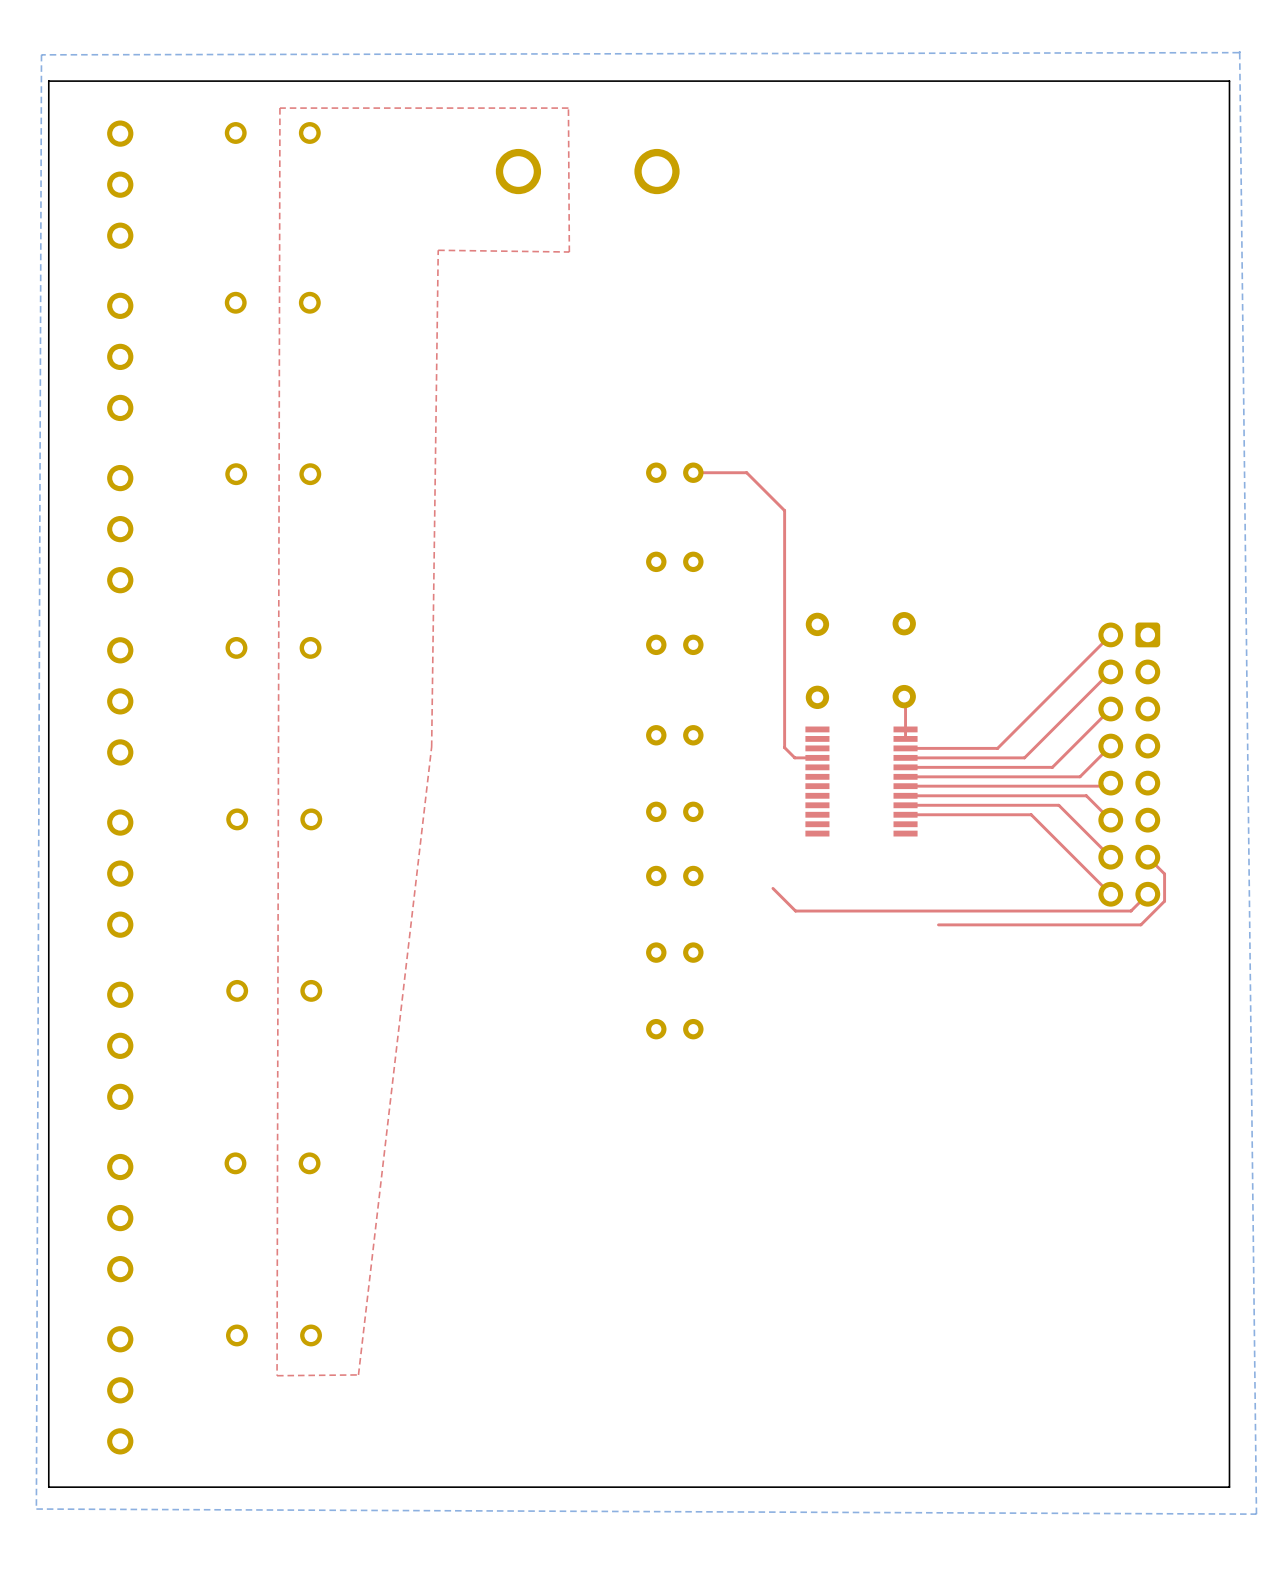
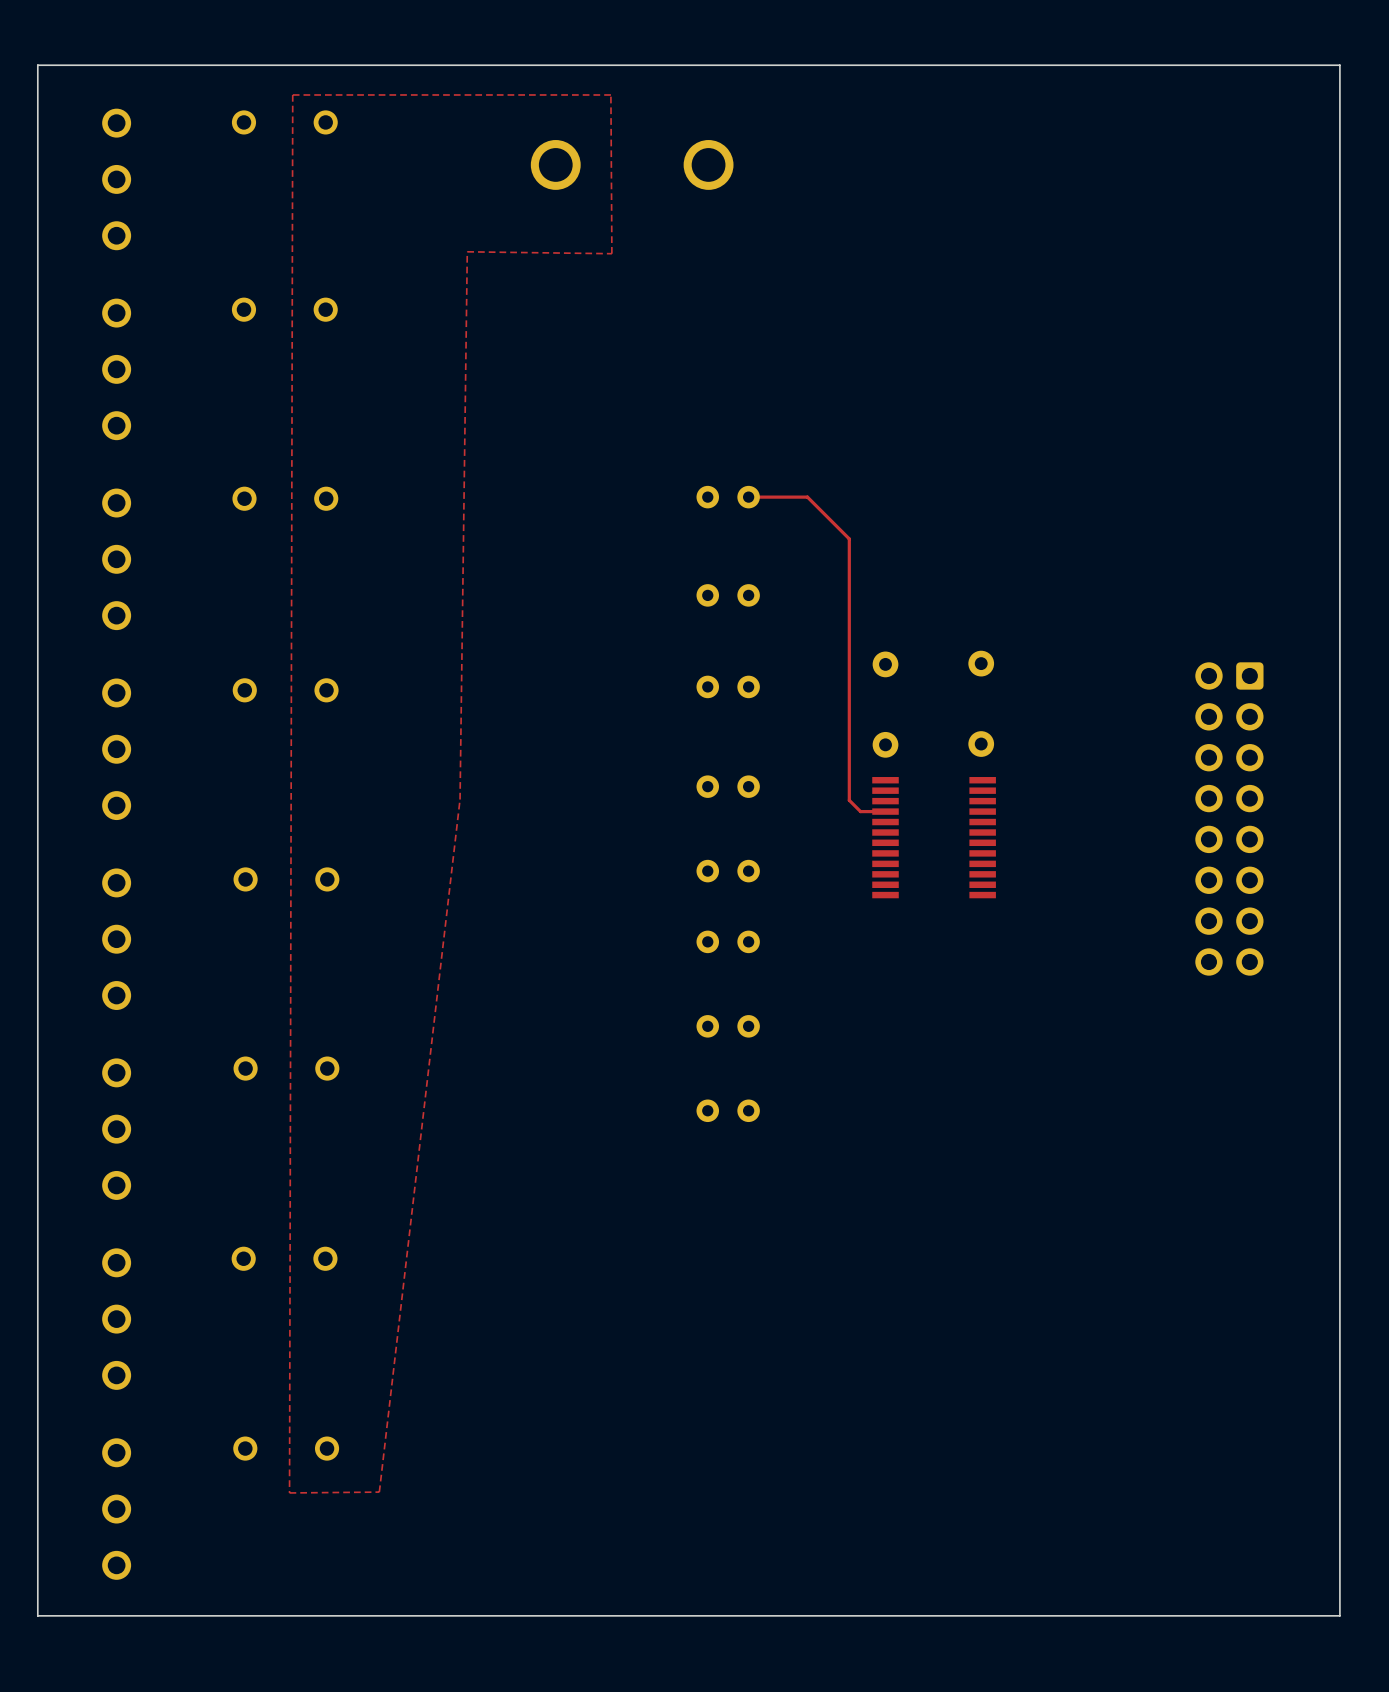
bottom zone outline: (1239, 51) (1256, 1514) (36, 1509) (41, 54) (1238, 51) -> none
top track: (1110, 635) (997, 748) (905, 748) -> none
top track: (1110, 671) (1024, 757) (905, 757) -> none
top track: (904, 696) (905, 738) -> none
top track: (1110, 709) (1052, 767) (905, 767) -> none
top track: (1110, 746) (1079, 776) (905, 776) -> none
top track: (1110, 783) (1107, 786) (905, 786) -> none
top track: (905, 795) (1086, 795) (1110, 820) -> none
top track: (905, 805) (1058, 805) (1110, 857) -> none
top track: (905, 814) (1031, 814) (1110, 894) -> none
top track: (1147, 857) (1164, 873) (1164, 901) (1140, 924) (938, 924) -> none
top track: (772, 888) (795, 911) (1131, 911) (1147, 894) -> none

